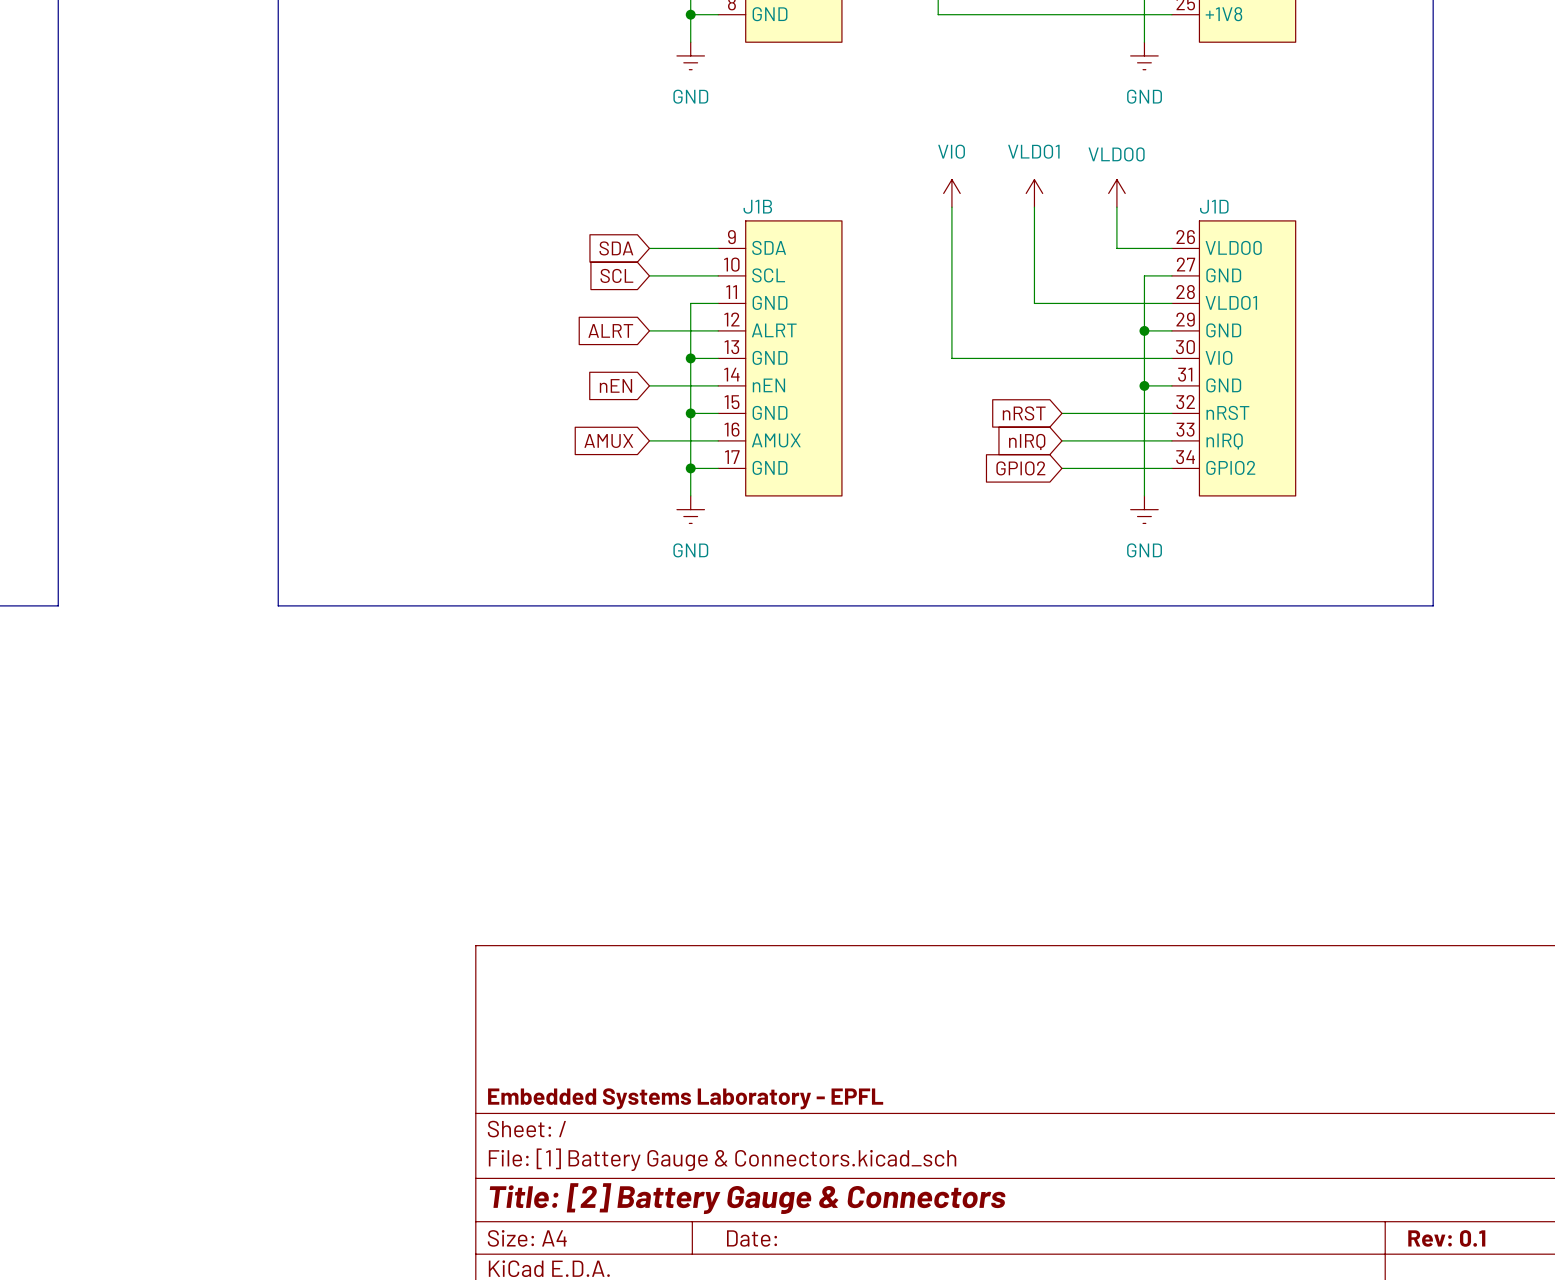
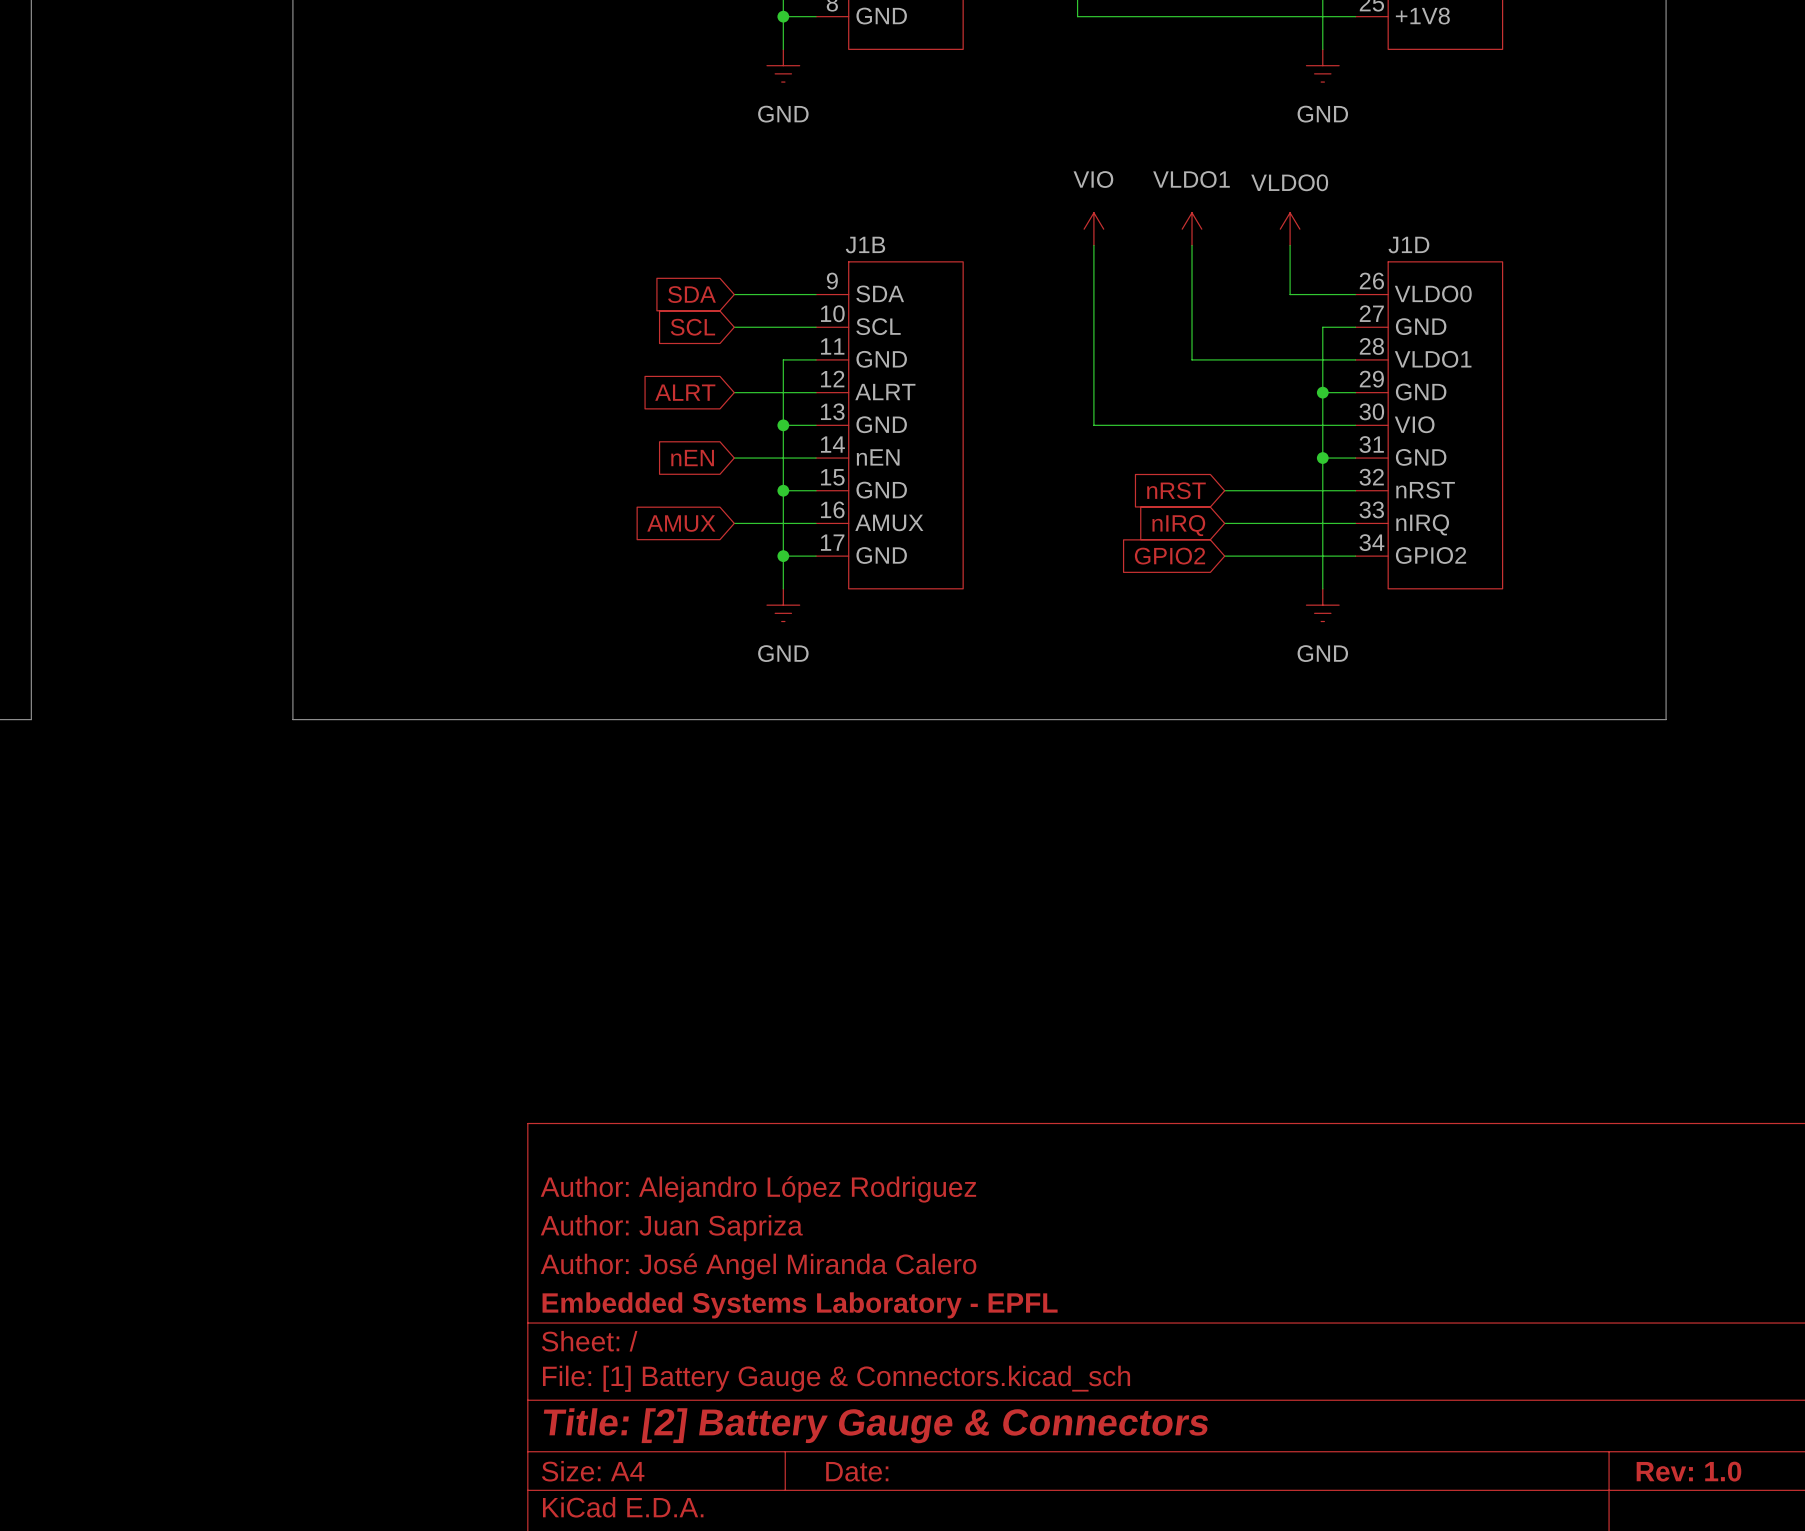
title block: none -> Author: Alejandro López Rodriguez (758, 1189)
title block: none -> Author: Juan Sapriza (671, 1228)
title block: none -> Author: José Angel Miranda Calero (758, 1266)
title block: Rev: 0.1 (1446, 1238) -> Rev: 1.0 (1688, 1471)

